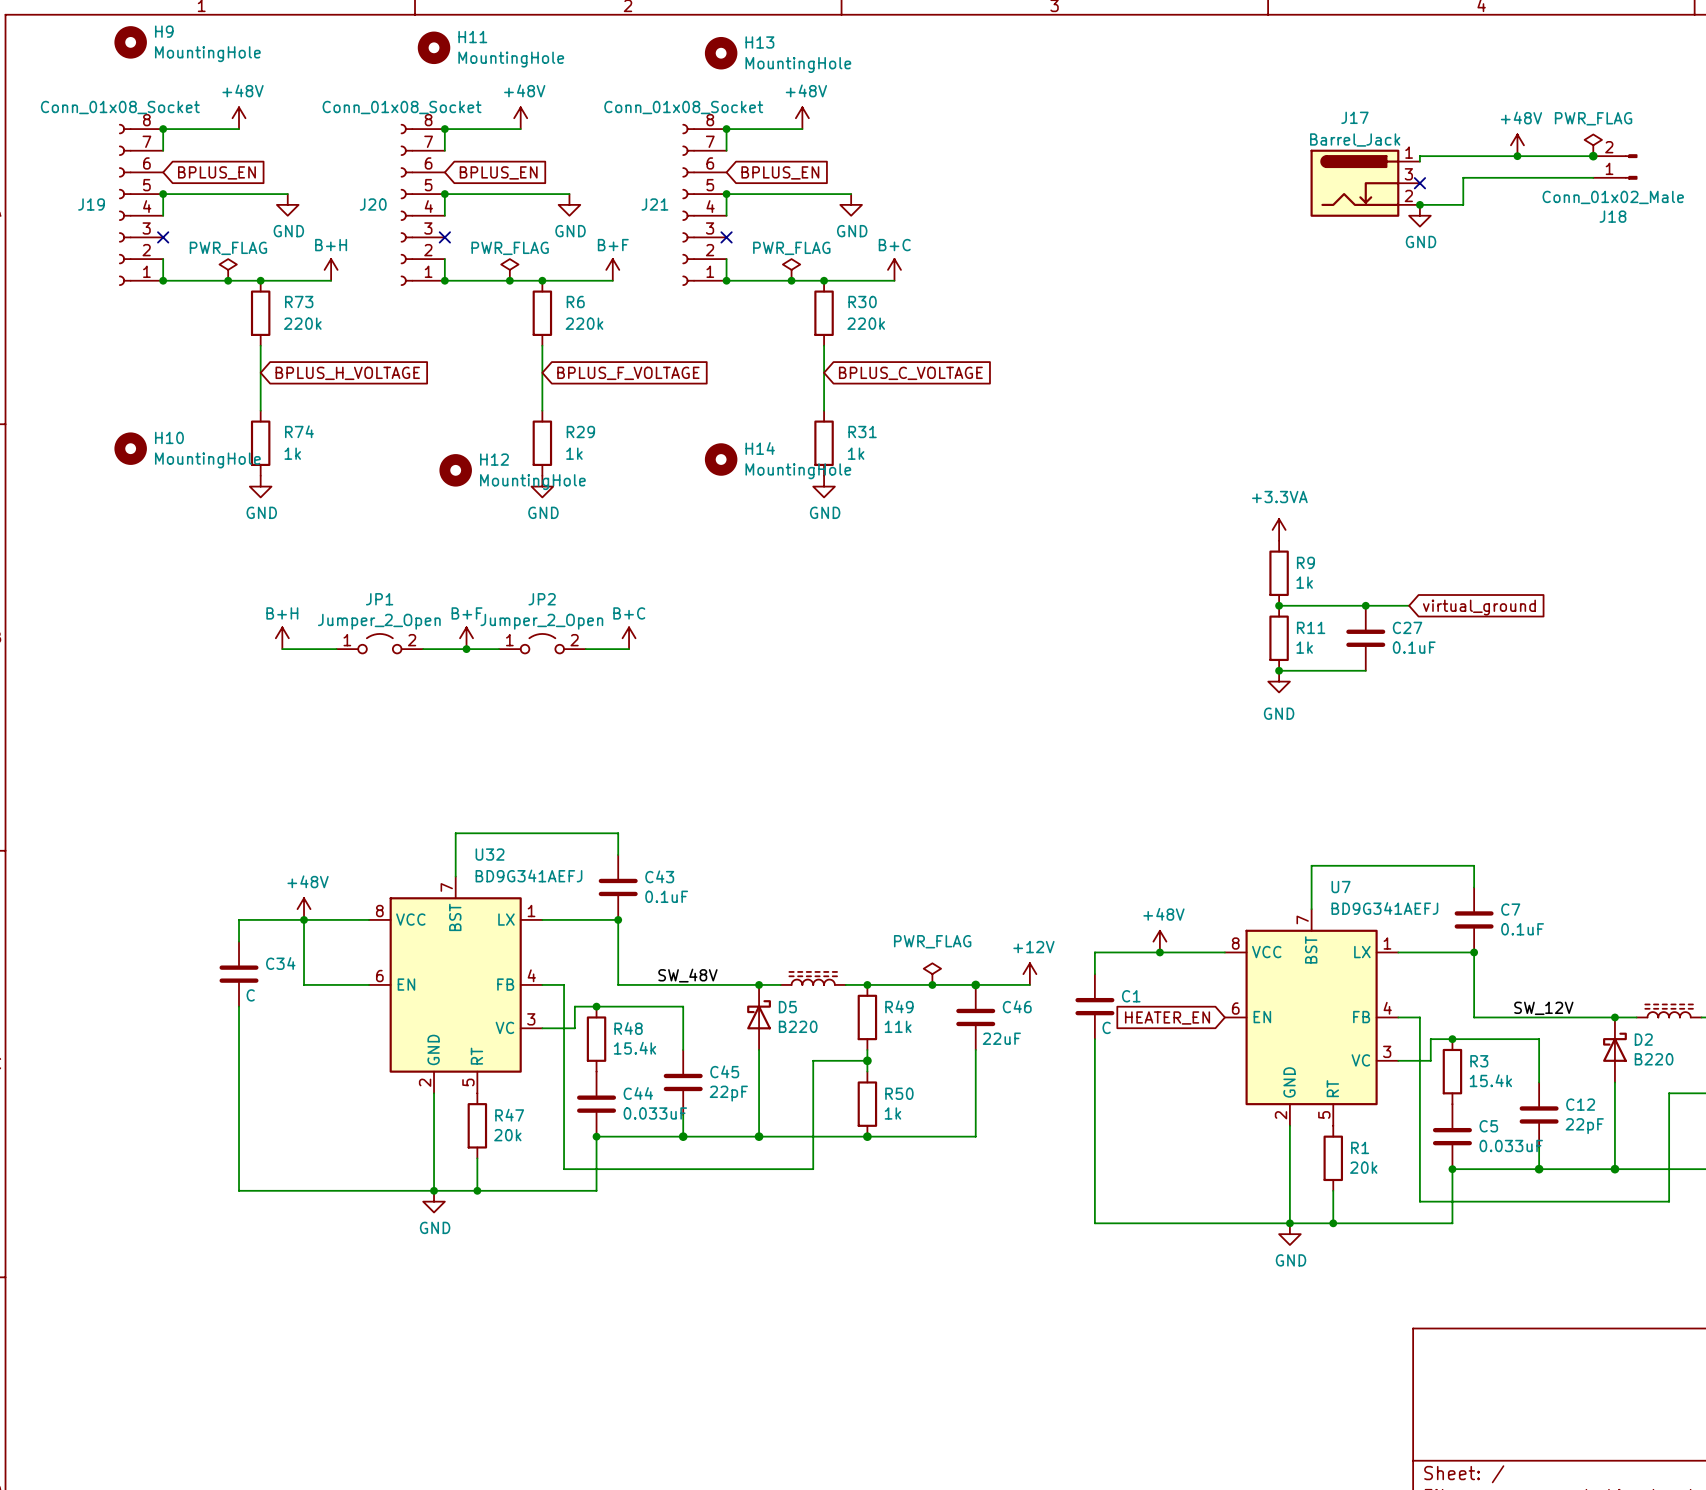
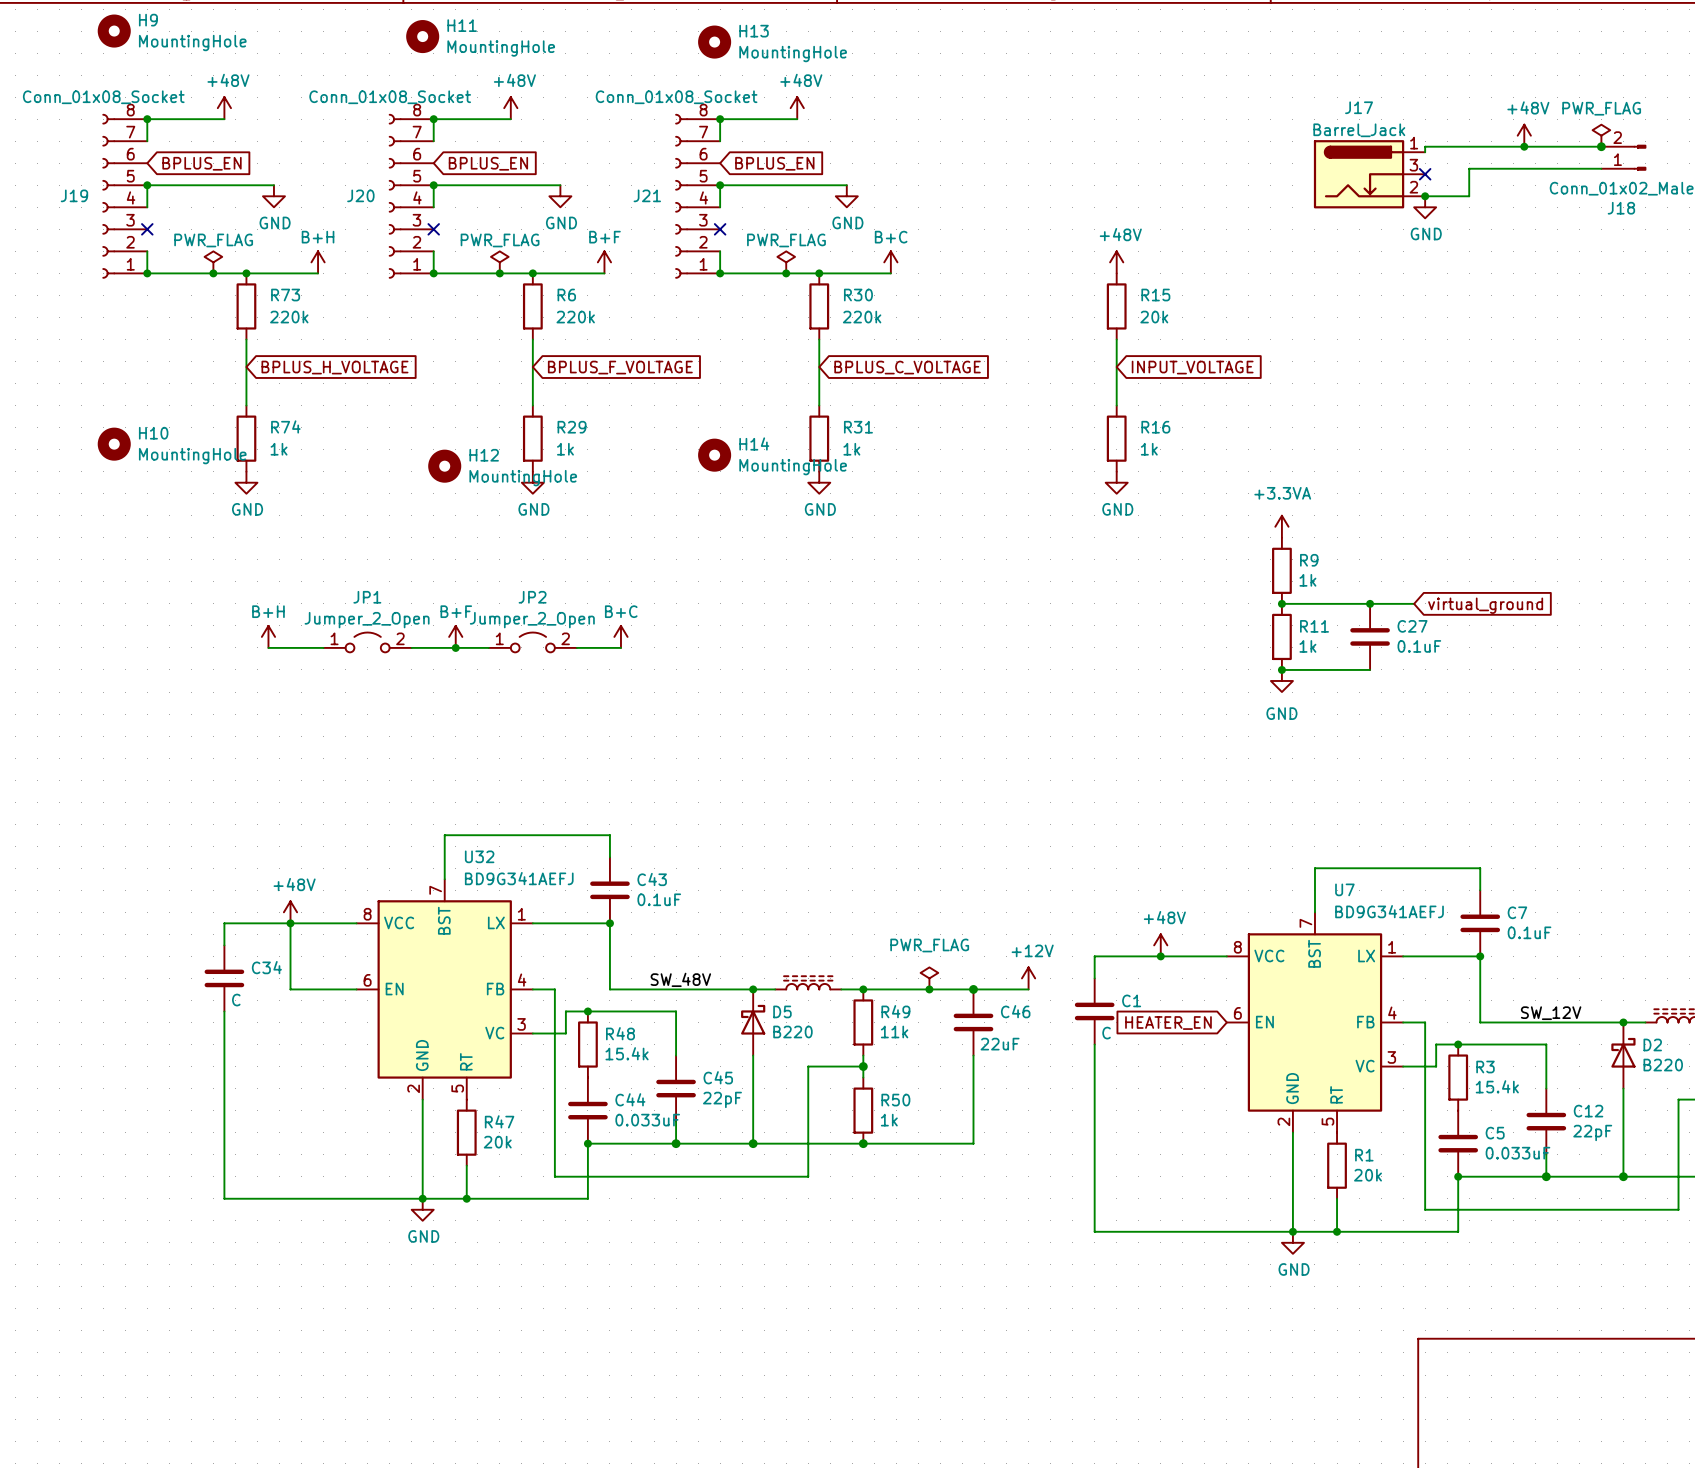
power symbol: none -> +48V (1116, 262)
R15: none -> 20k (1116, 306)
wire: none -> (1116, 339) (1116, 405)
global label: none -> INPUT_VOLTAGE (1192, 367)
R16: none -> 1k (1116, 438)
power symbol: none -> GND (1116, 482)

